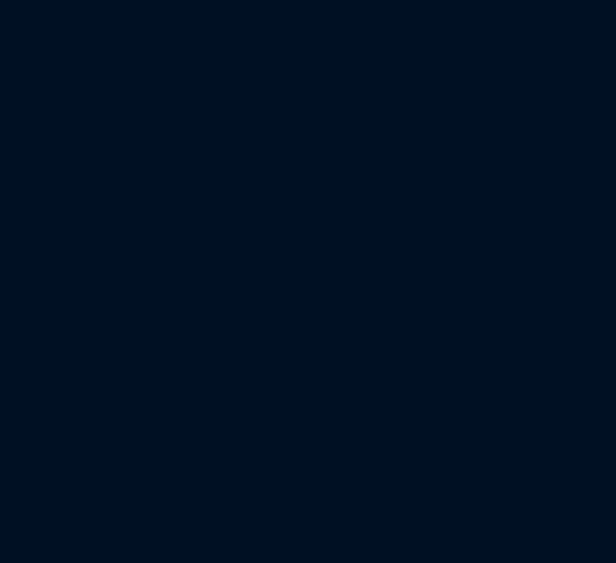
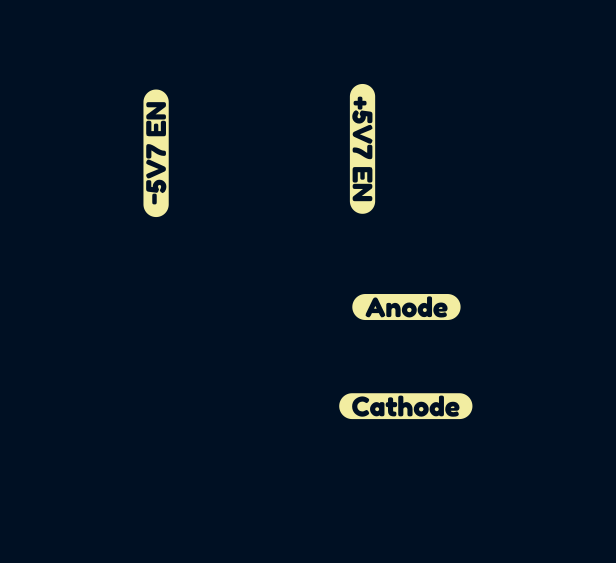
drawing: none -> [349, 83, 376, 214]
drawing: none -> [143, 89, 169, 218]
drawing: none -> [352, 294, 461, 321]
drawing: none -> [339, 393, 473, 420]

